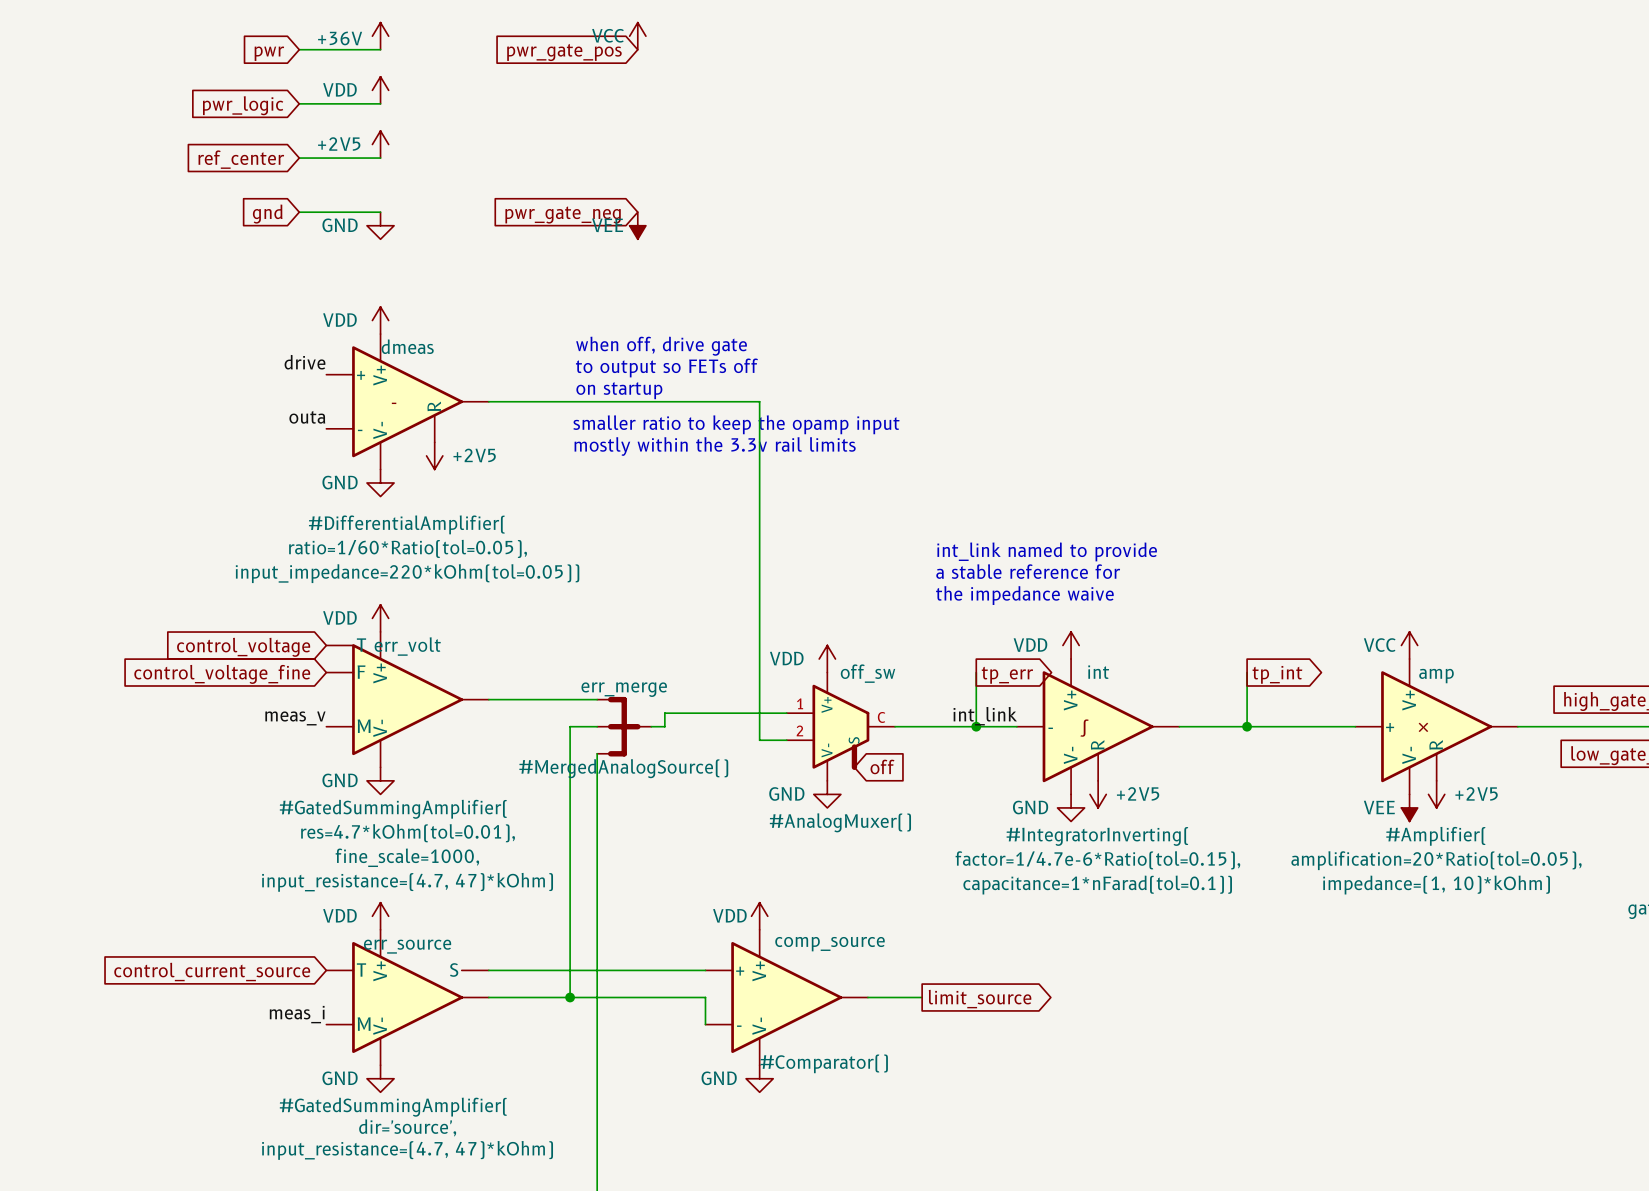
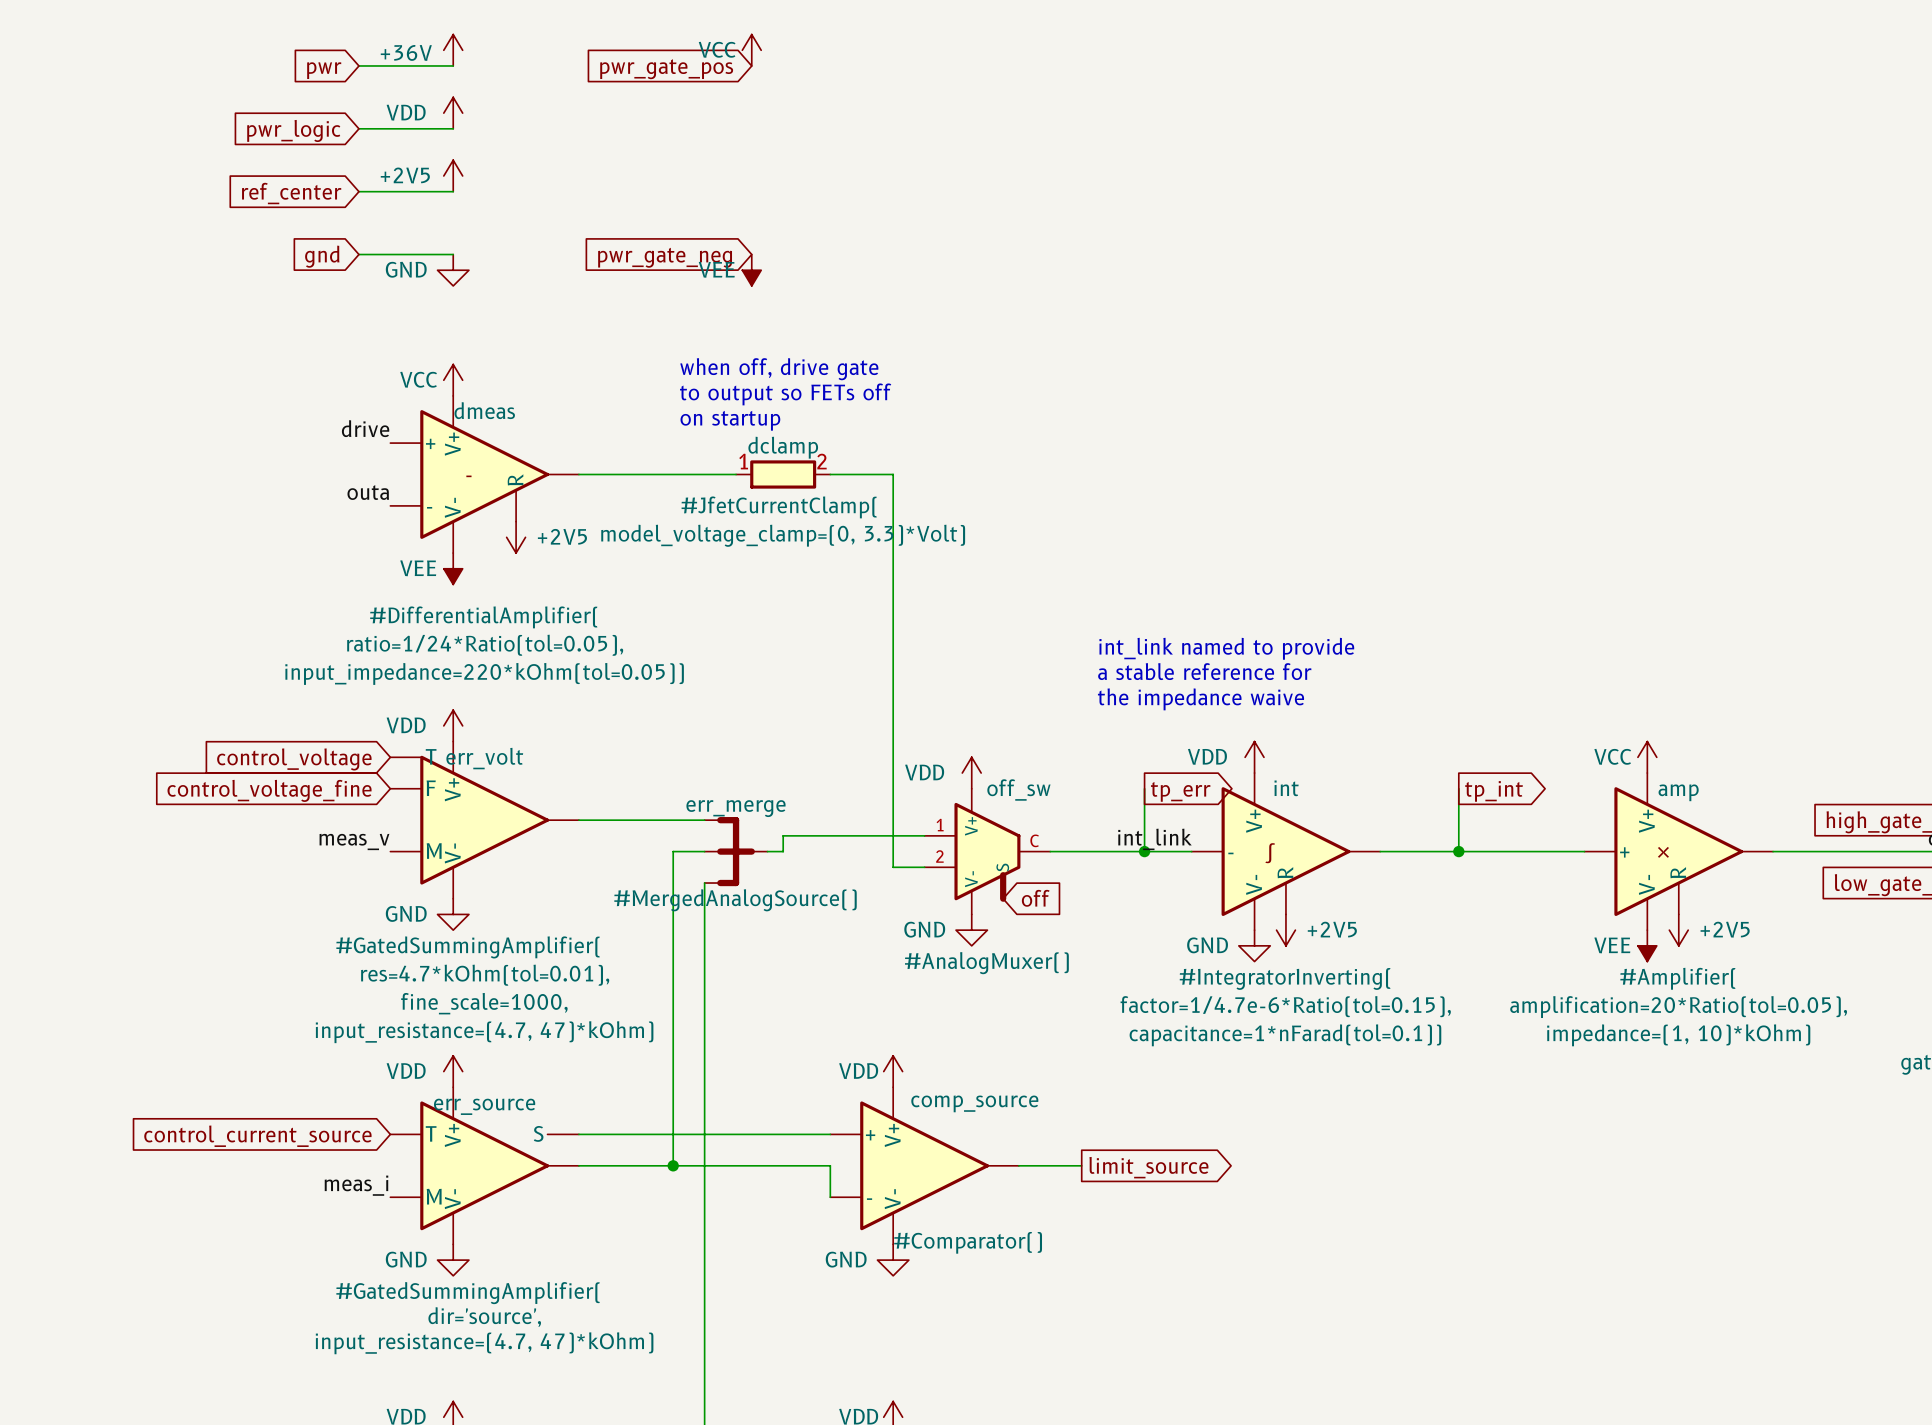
power symbol: VDD (380, 320) -> VCC (453, 380)
text position: when off, drive gate (661, 346) -> when off, drive gate (779, 369)
text position: to output so FETs off (666, 367) -> to output so FETs off (785, 394)
text position: on startup (619, 390) -> on startup (730, 420)
dclamp: none -> #JfetCurrentClamp( (783, 474)
text: smaller ratio to keep the opamp input (736, 424) -> none
text: mostly within the 3.3v rail limits (715, 446) -> none
power symbol: GND (380, 482) -> VEE (453, 568)
dmeas text: ratio=1/60*Ratio(tol=0.05), (408, 548) -> ratio=1/24*Ratio(tol=0.05), (485, 645)

